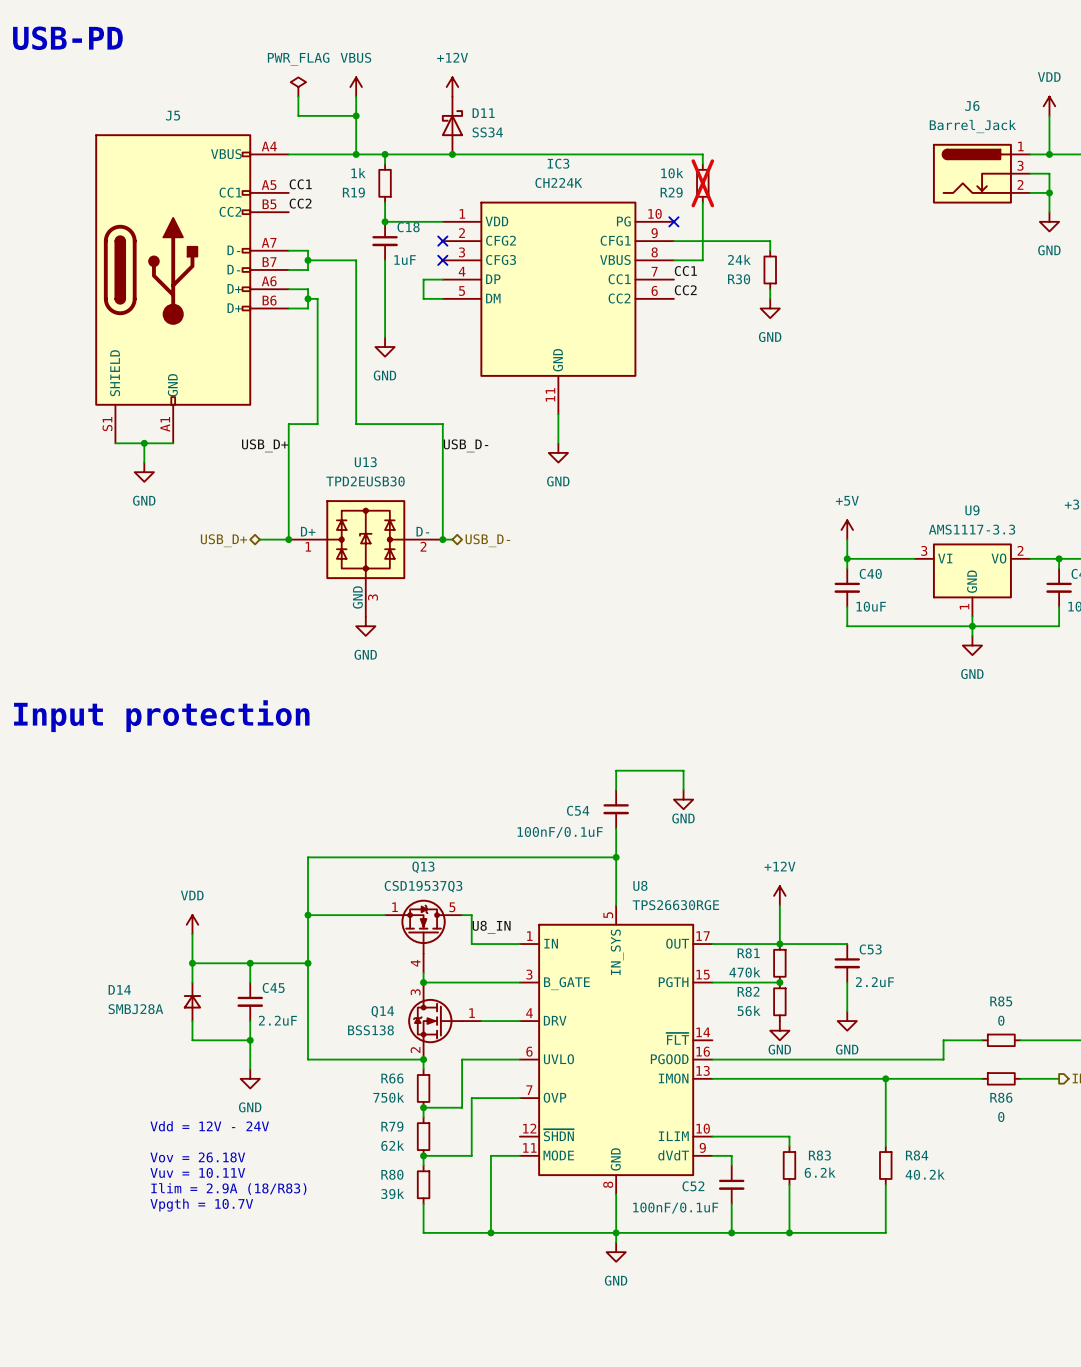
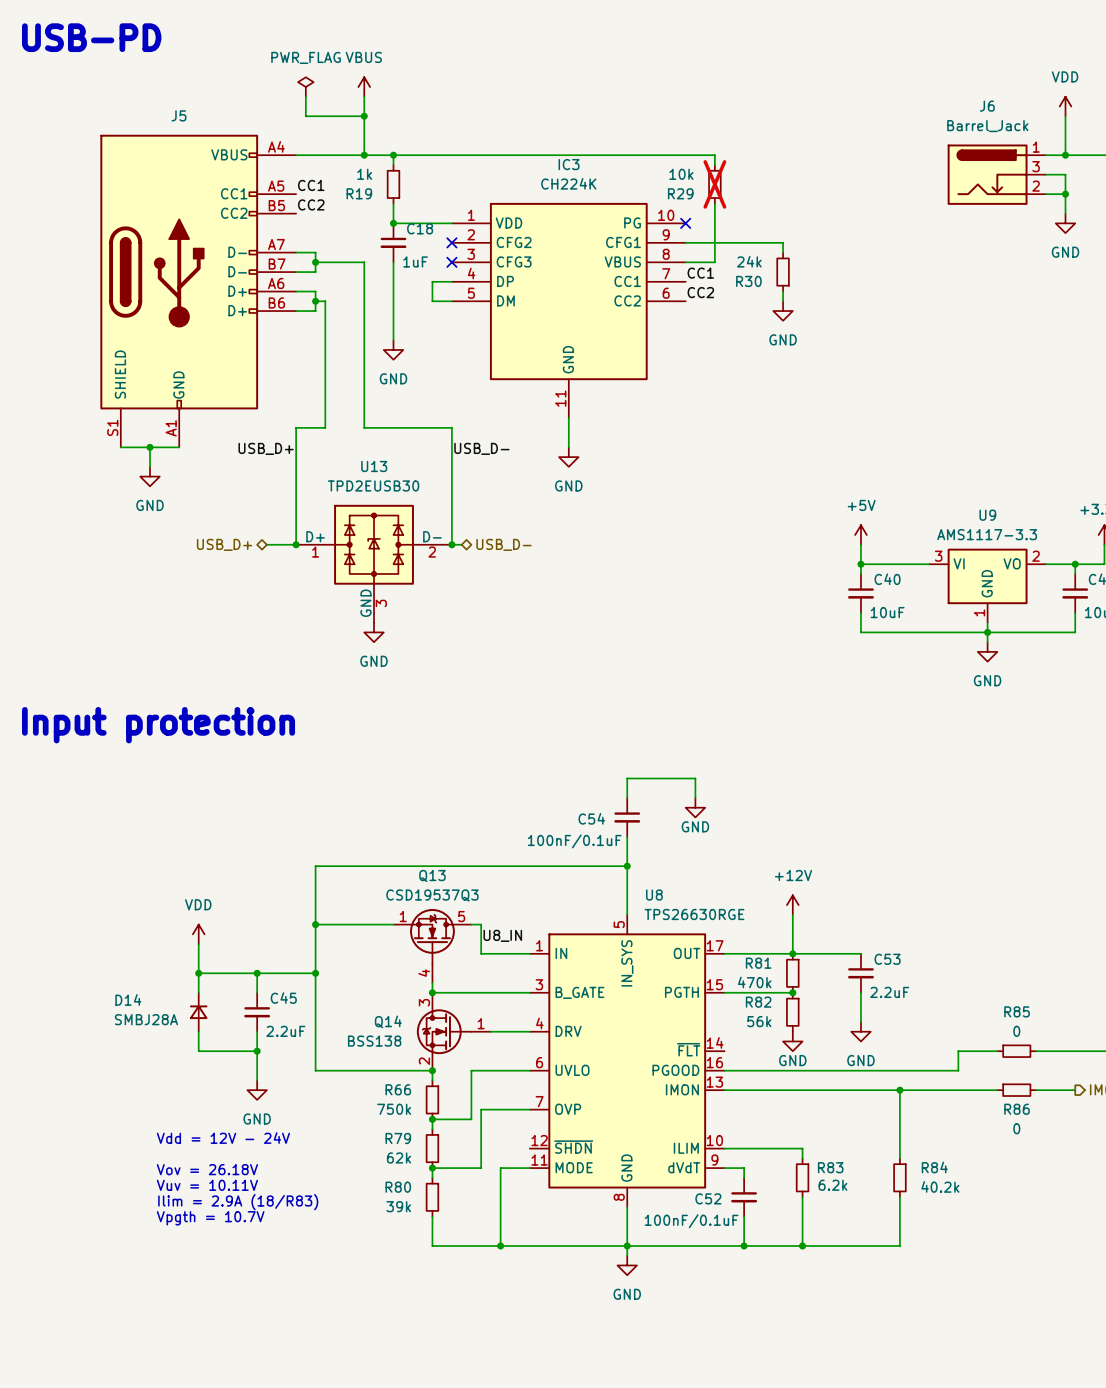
power symbol: +12V (452, 87) -> none
D11: SS34 (452, 125) -> none
junction: (452, 154) -> none

